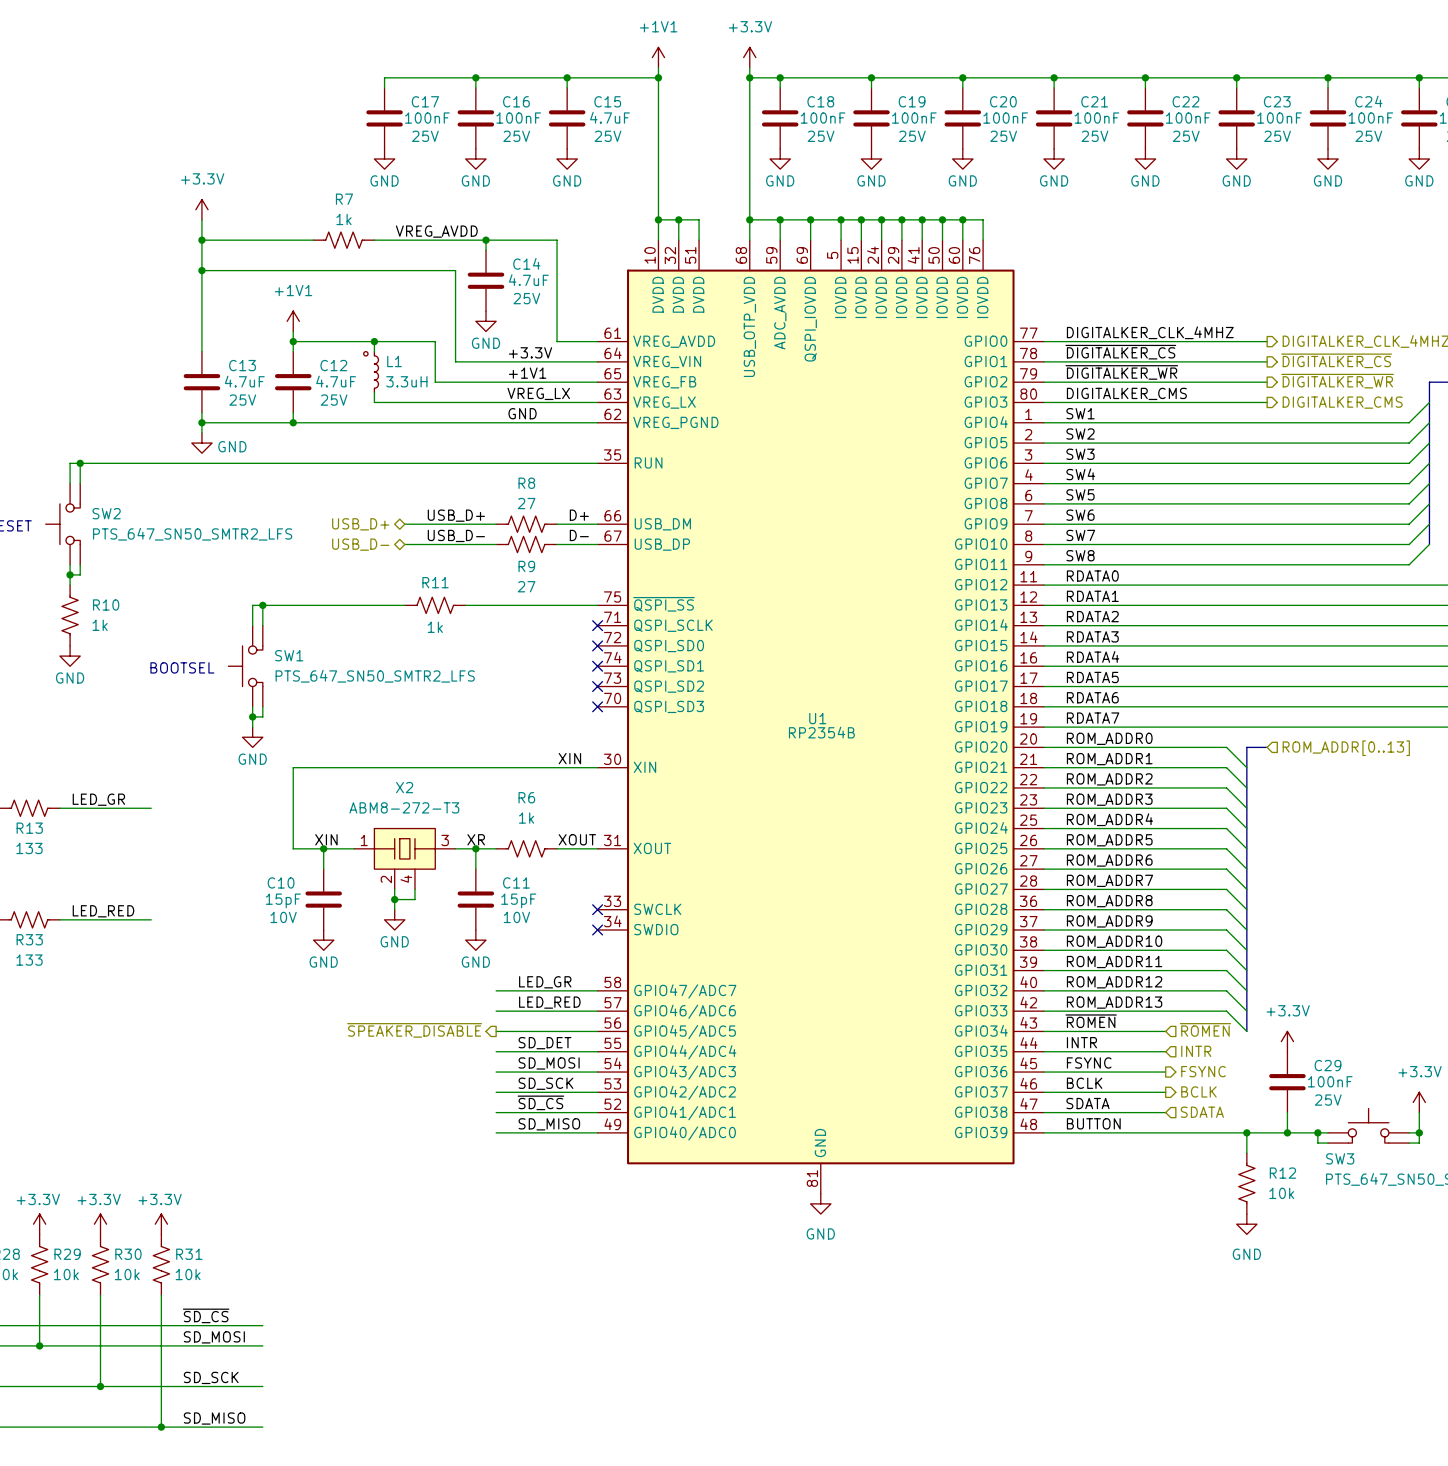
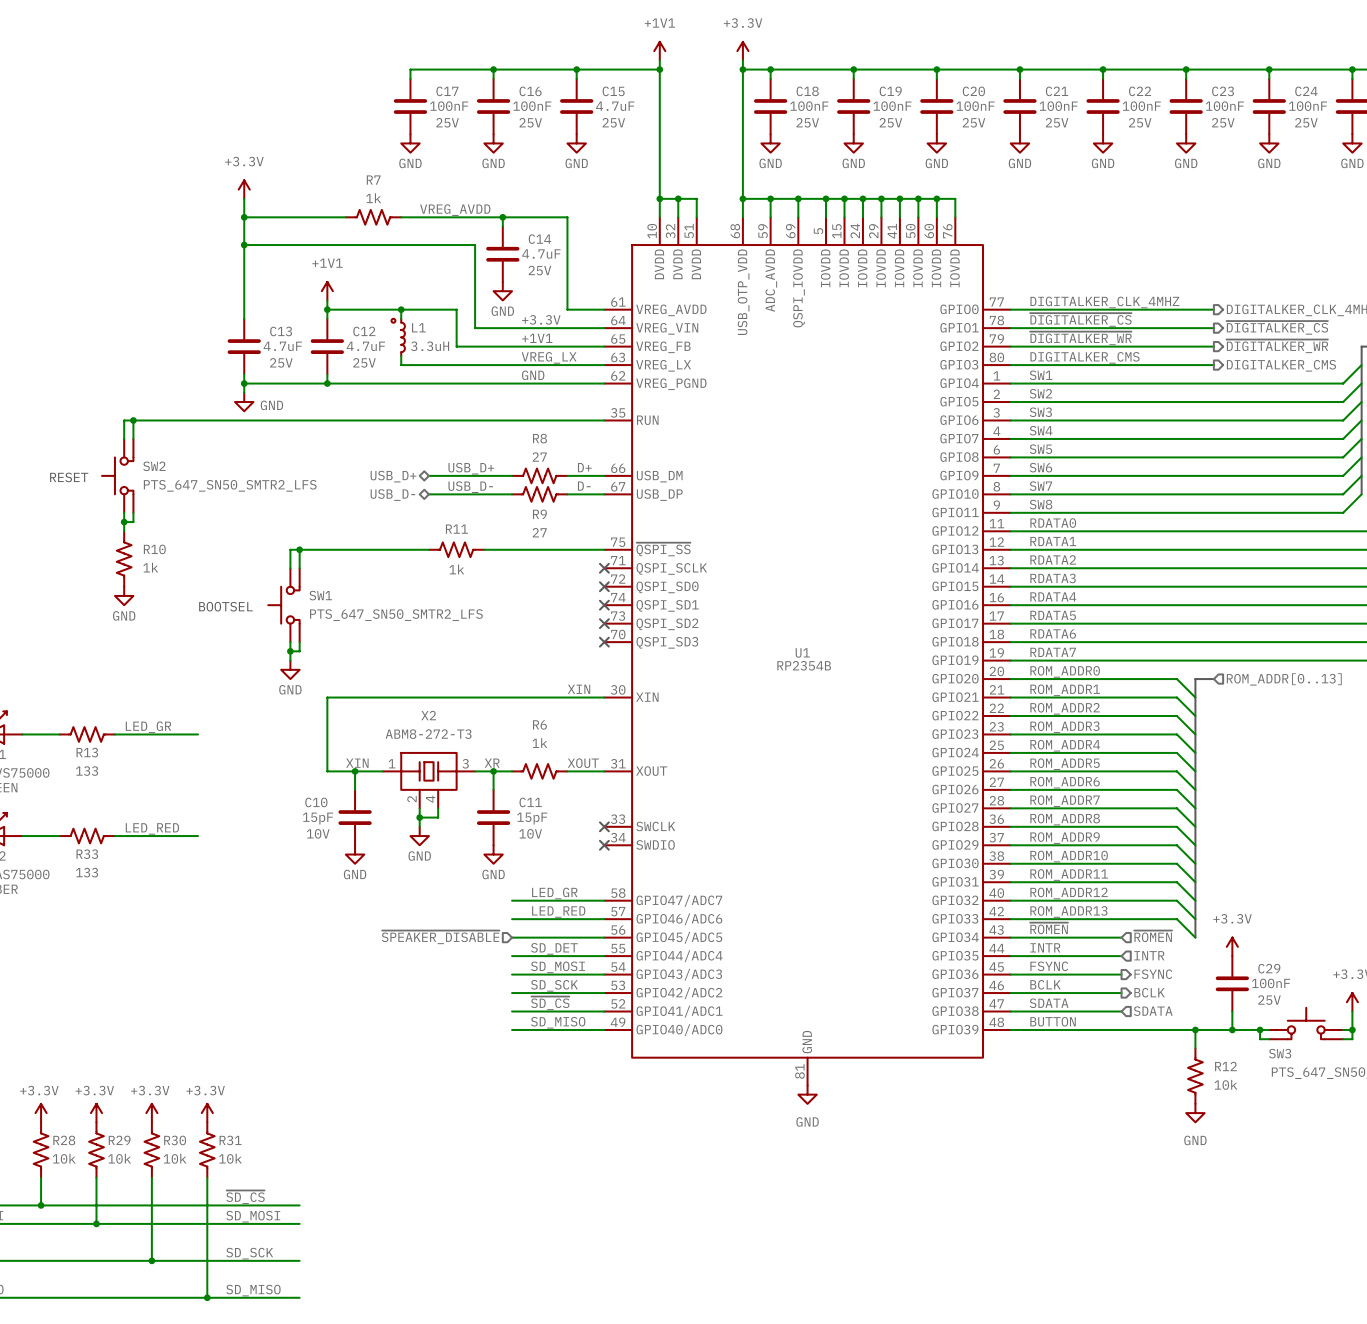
hierarchical label shape: output (414, 1030) -> input (440, 937)

